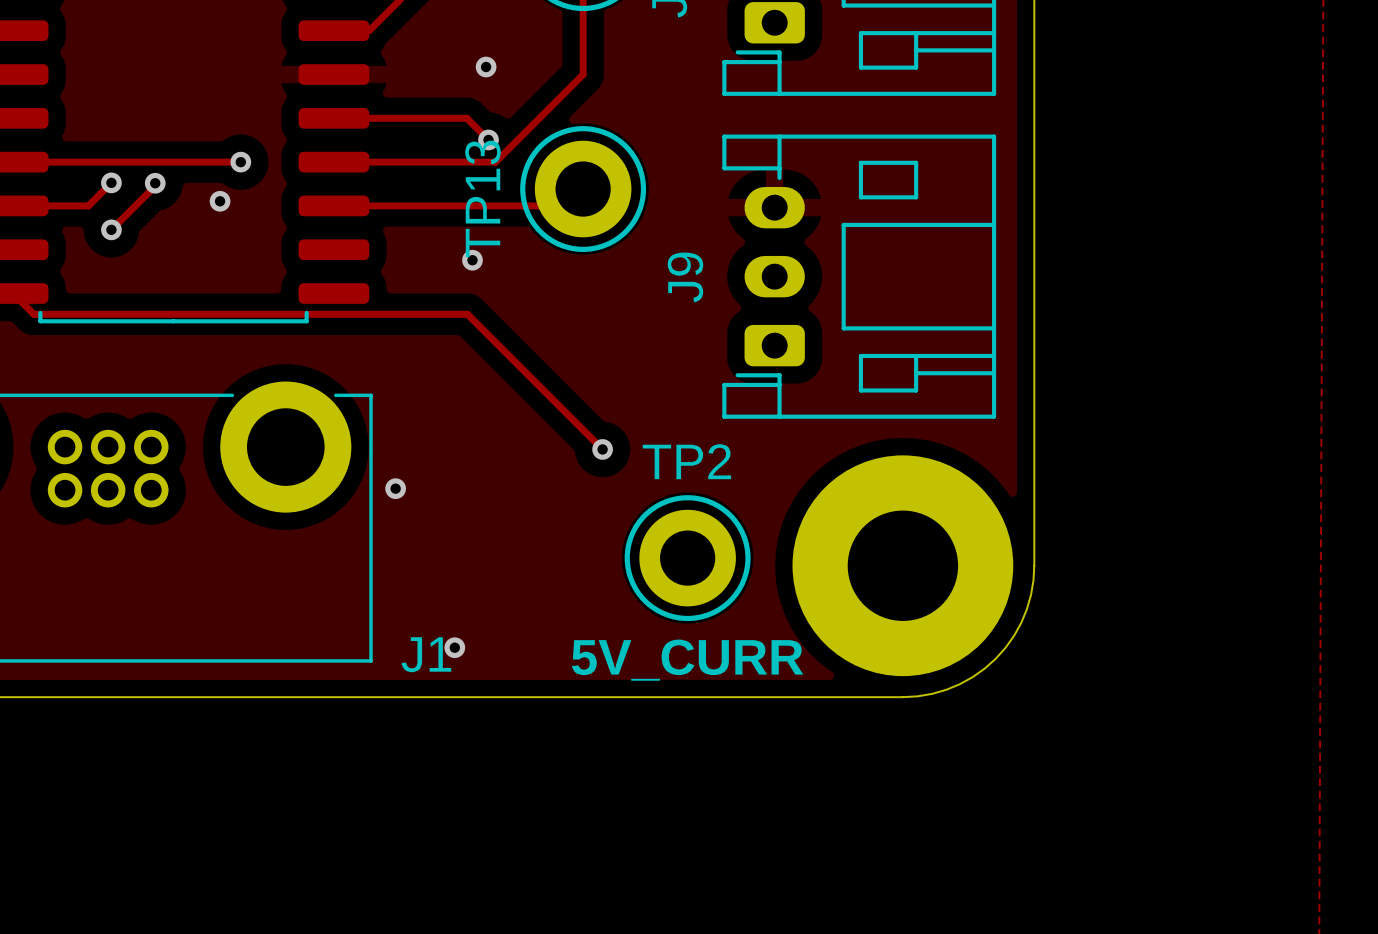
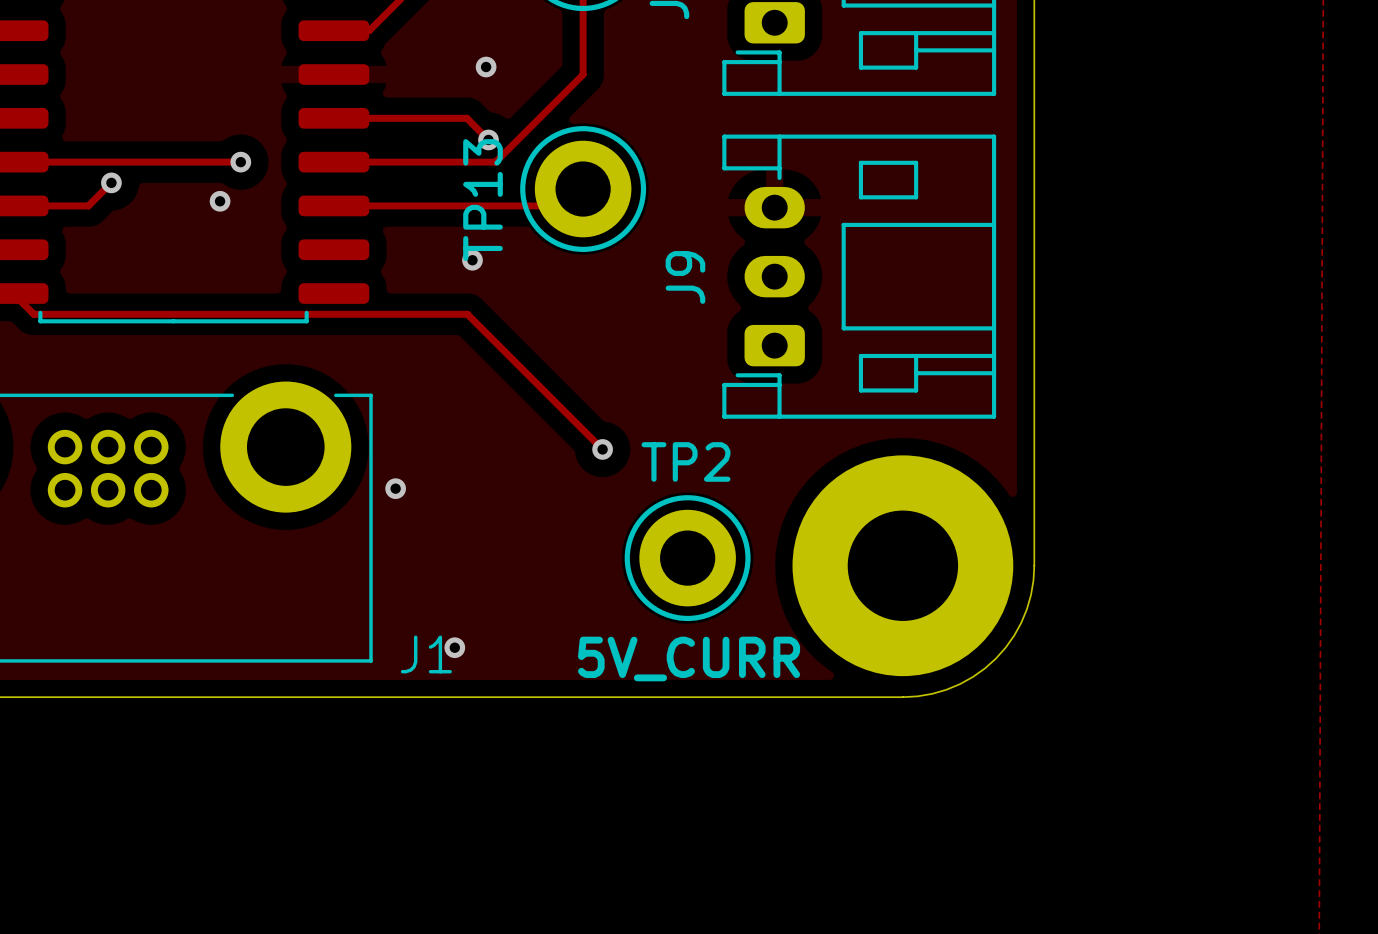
track: (155, 183) (155, 186) (111, 229) -> none
via: (155, 183) -> none
via: (111, 229) -> none

